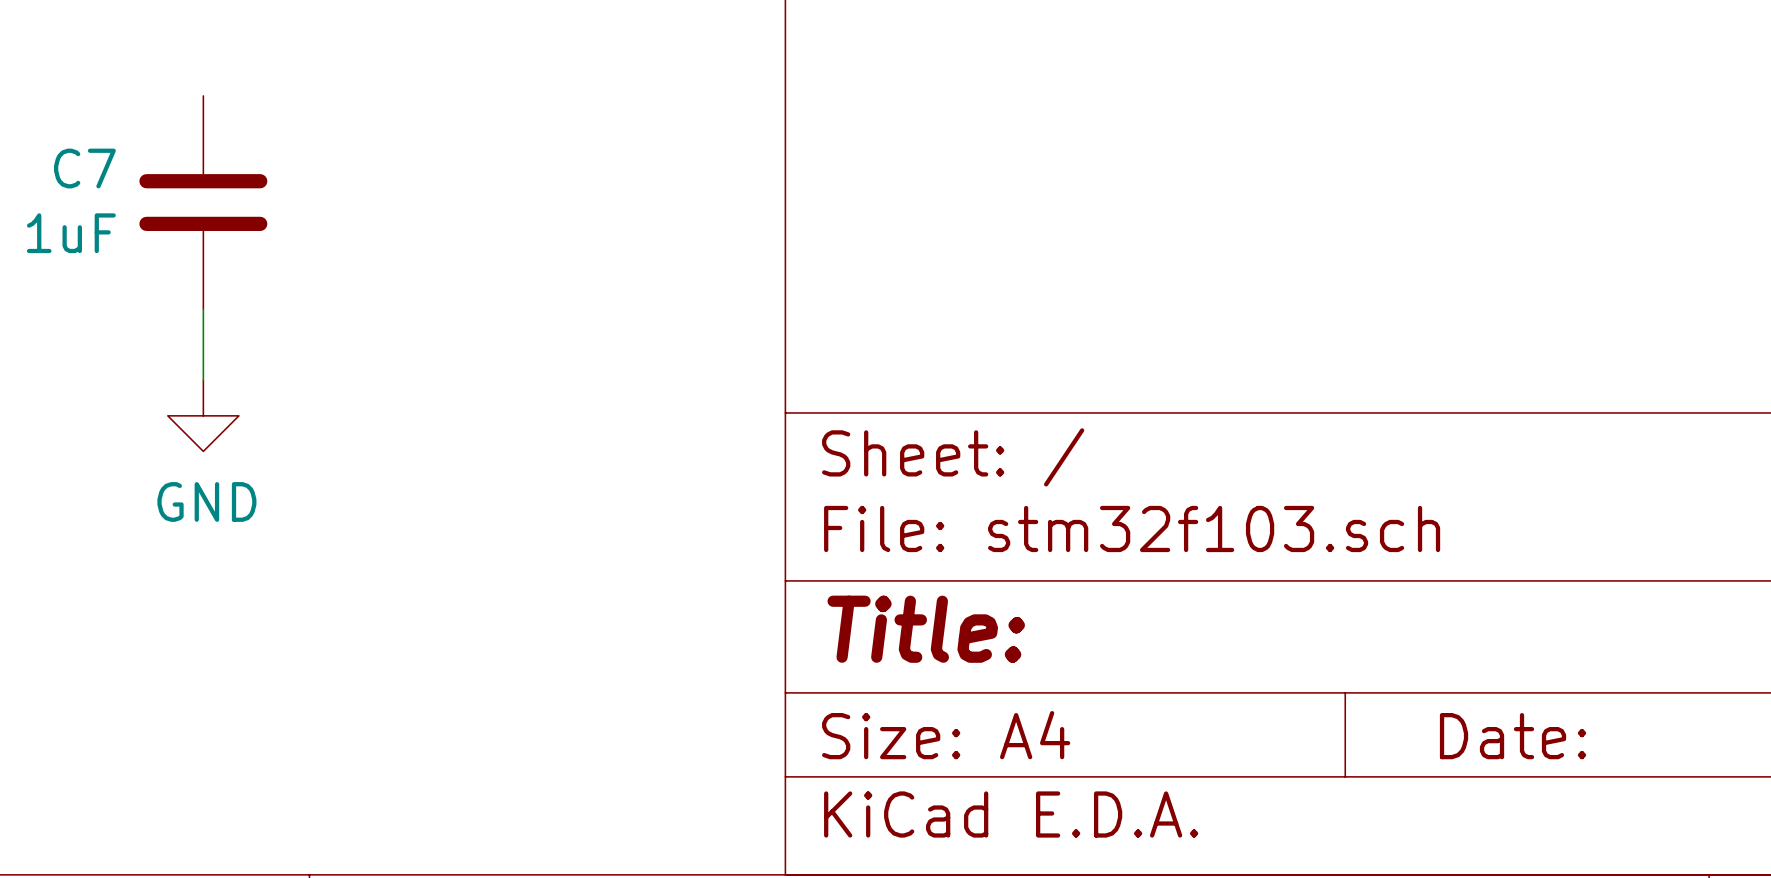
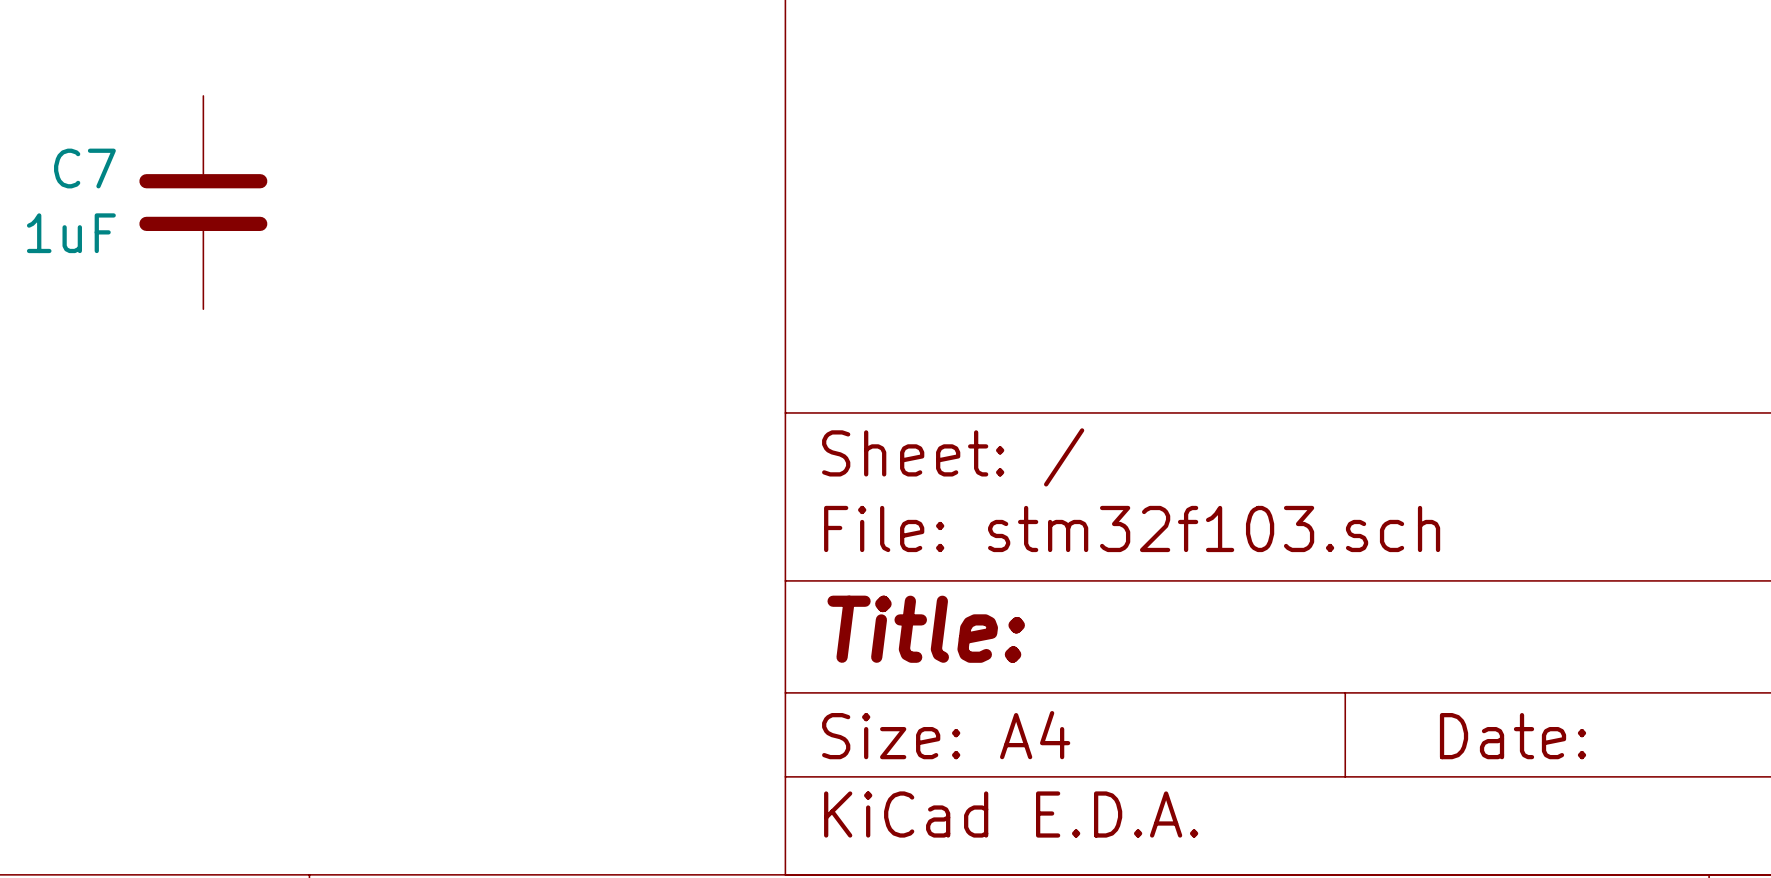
wire: (203, 309) (203, 380) -> none
power symbol: GND (203, 415) -> none

